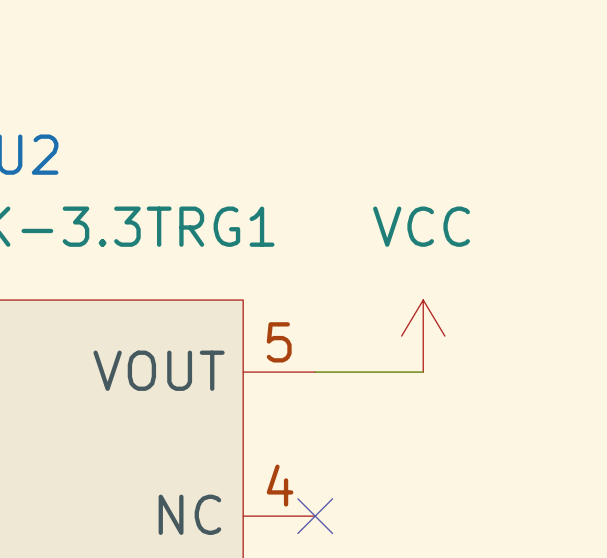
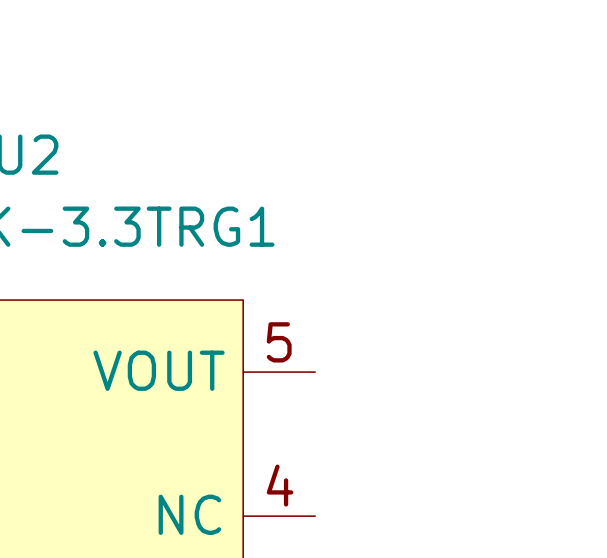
power symbol: VCC (423, 336) -> none
wire: (315, 372) (423, 372) -> none
no-connect mark: (315, 516) -> none

